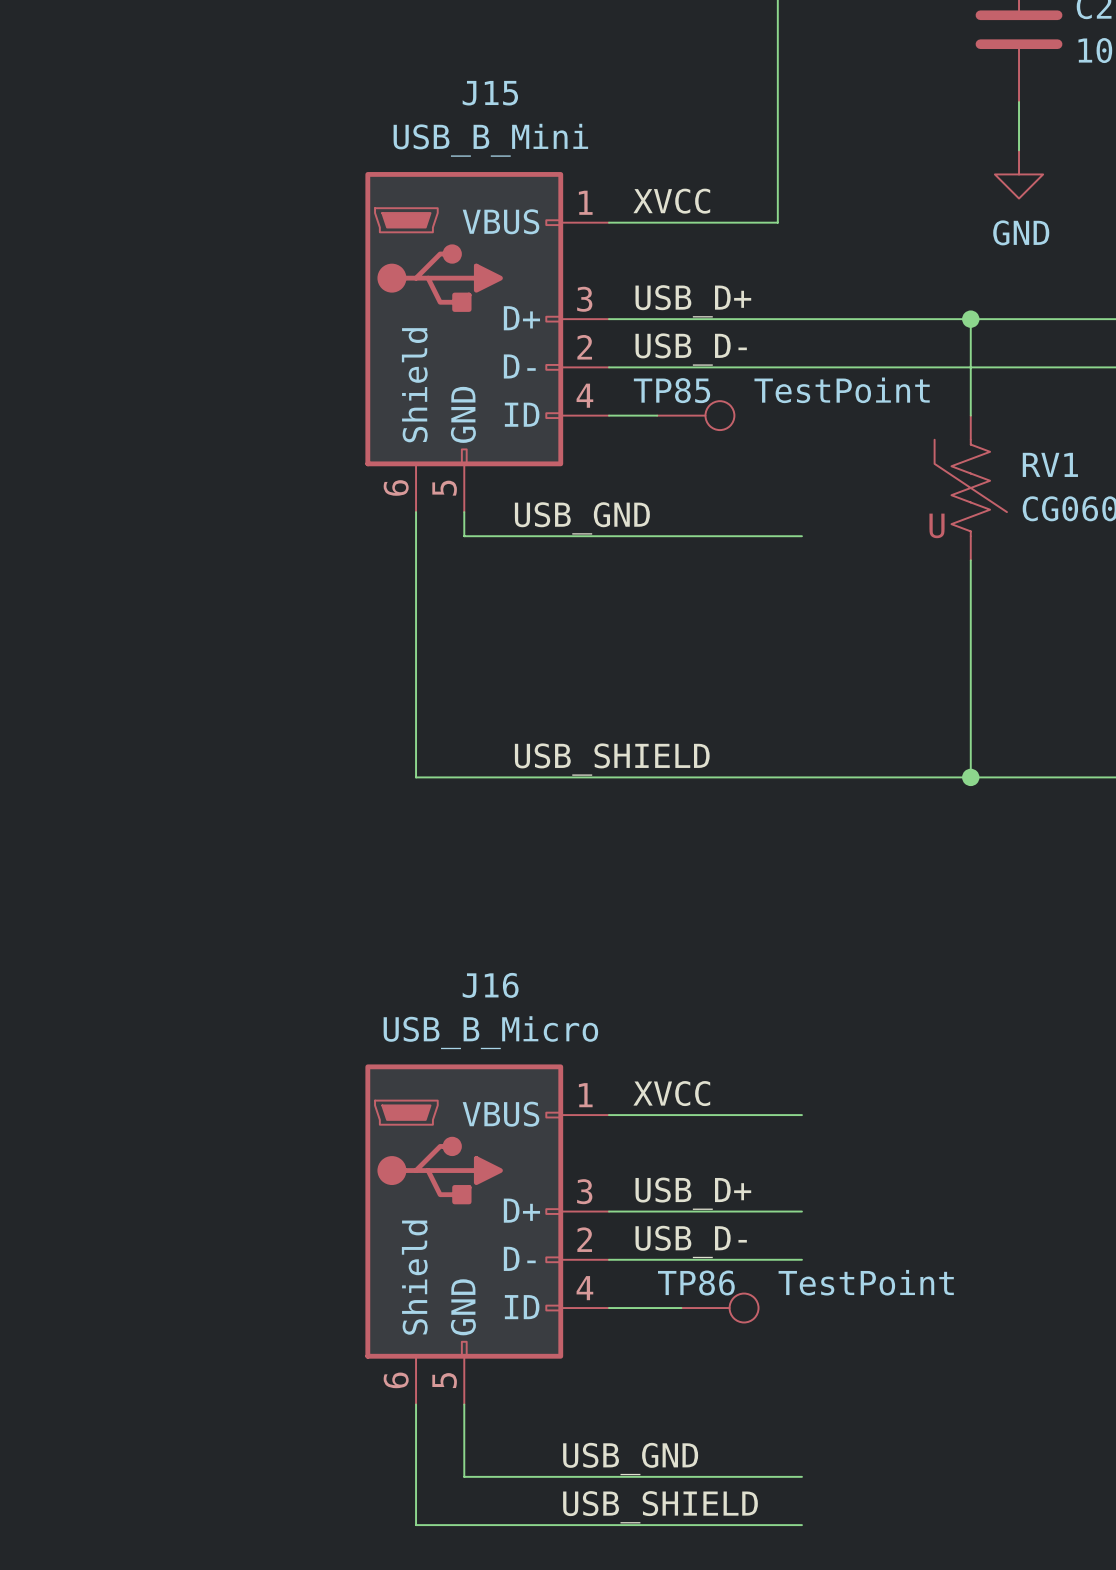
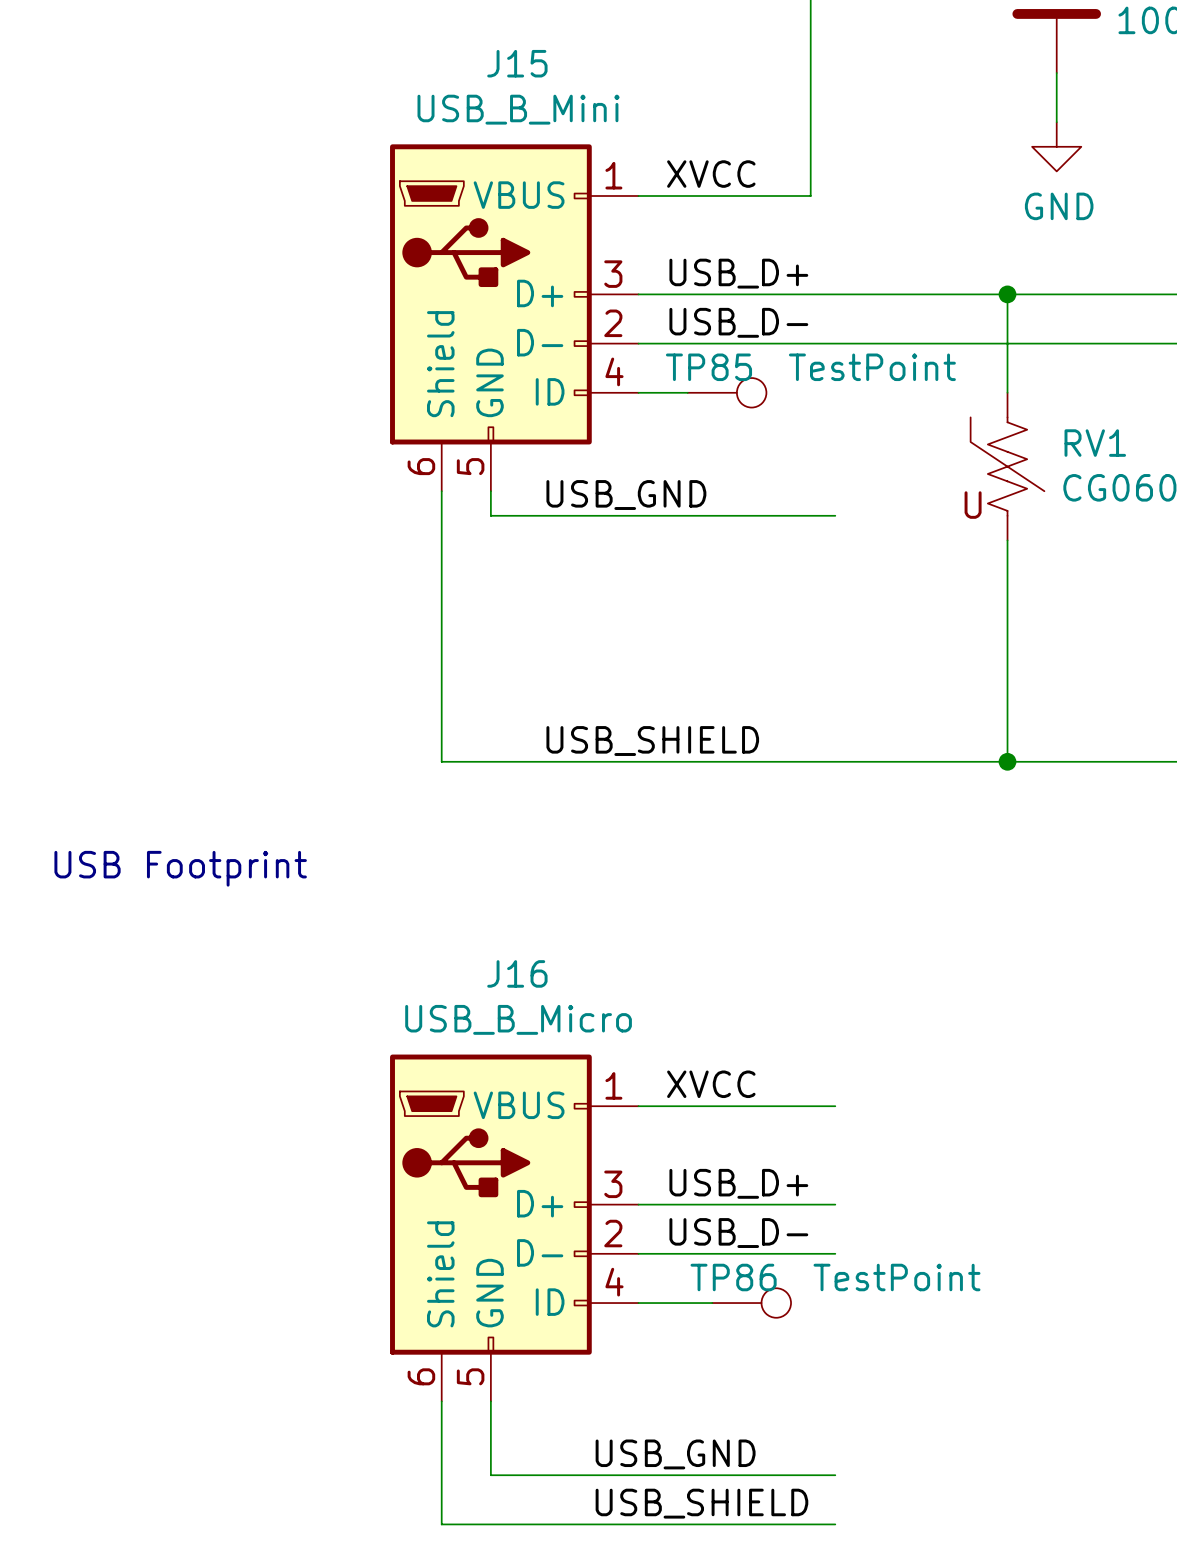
text: none -> USB Footprint (180, 868)

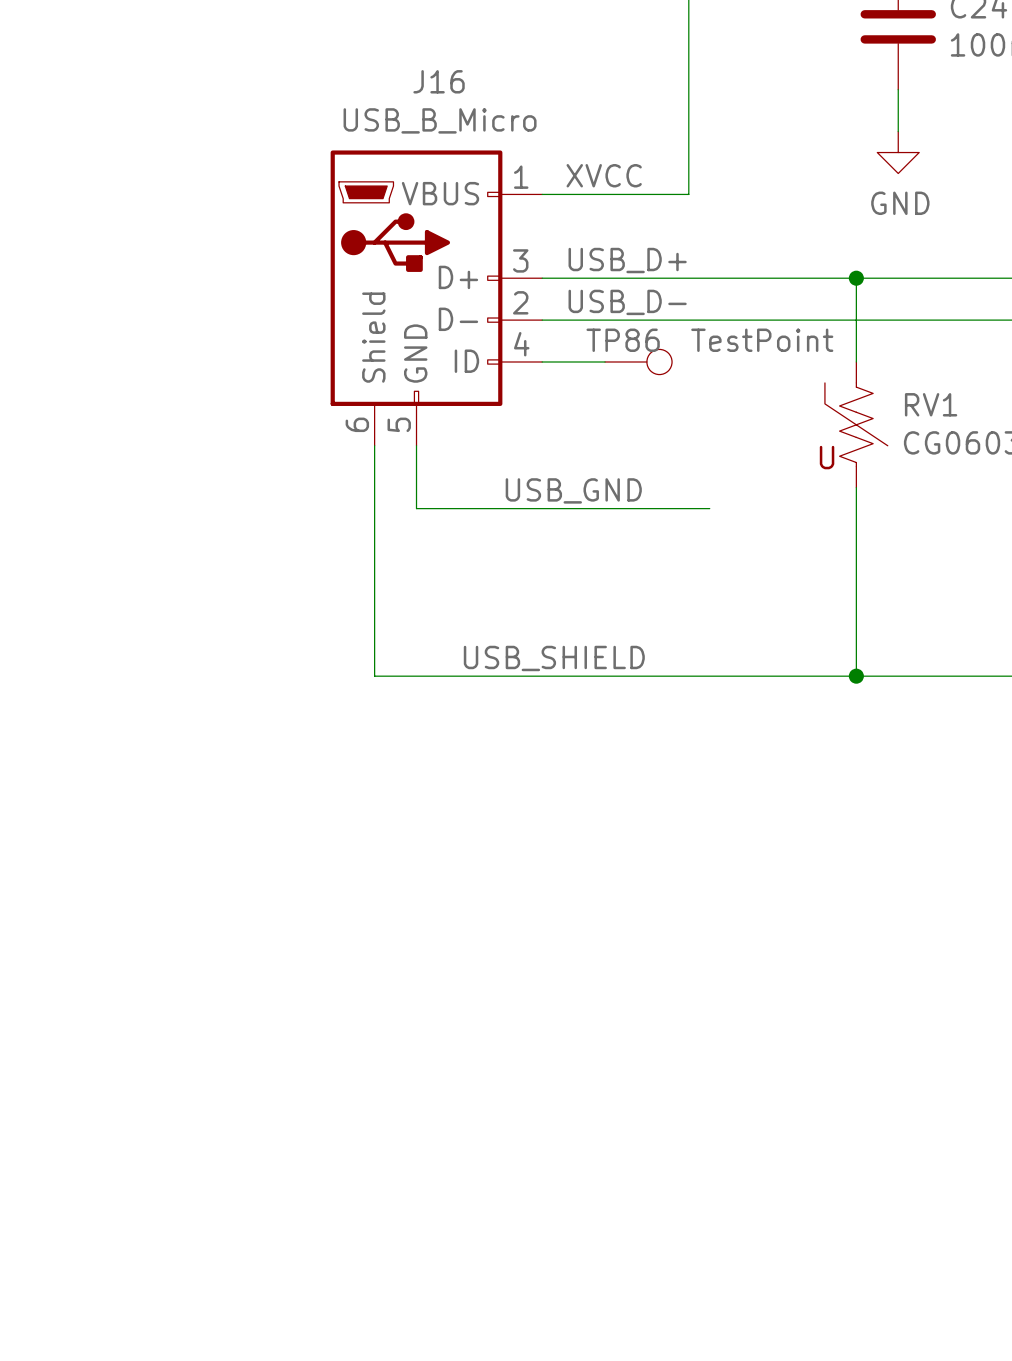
J15 name: J15 (517, 63) -> J16 (439, 81)
J15 value: USB_B_Mini (518, 109) -> USB_B_Micro (440, 120)
TP85: TestPoint (727, 392) -> none
label position: USB_GND (626, 495) -> USB_GND (573, 490)
wire: (490, 515) (835, 515) -> (416, 466) (416, 508) (709, 508)
text: USB Footprint (180, 868) -> none
label: XVCC (711, 1084) -> none
wire: (638, 1106) (835, 1106) -> none
label: USB_D+ (738, 1183) -> none
wire: (638, 1204) (835, 1204) -> none
J16: USB_B_Micro (514, 1227) -> none
label: USB_D- (738, 1233) -> none
wire: (638, 1253) (835, 1253) -> none
wire: (638, 1303) (712, 1303) -> none
TP86 position: (751, 1303) -> (638, 361)
wire: (441, 1401) (441, 1524) (835, 1524) -> none
wire: (490, 1401) (490, 1475) (835, 1475) -> none
label: USB_GND (675, 1454) -> none
label: USB_SHIELD (701, 1503) -> none

